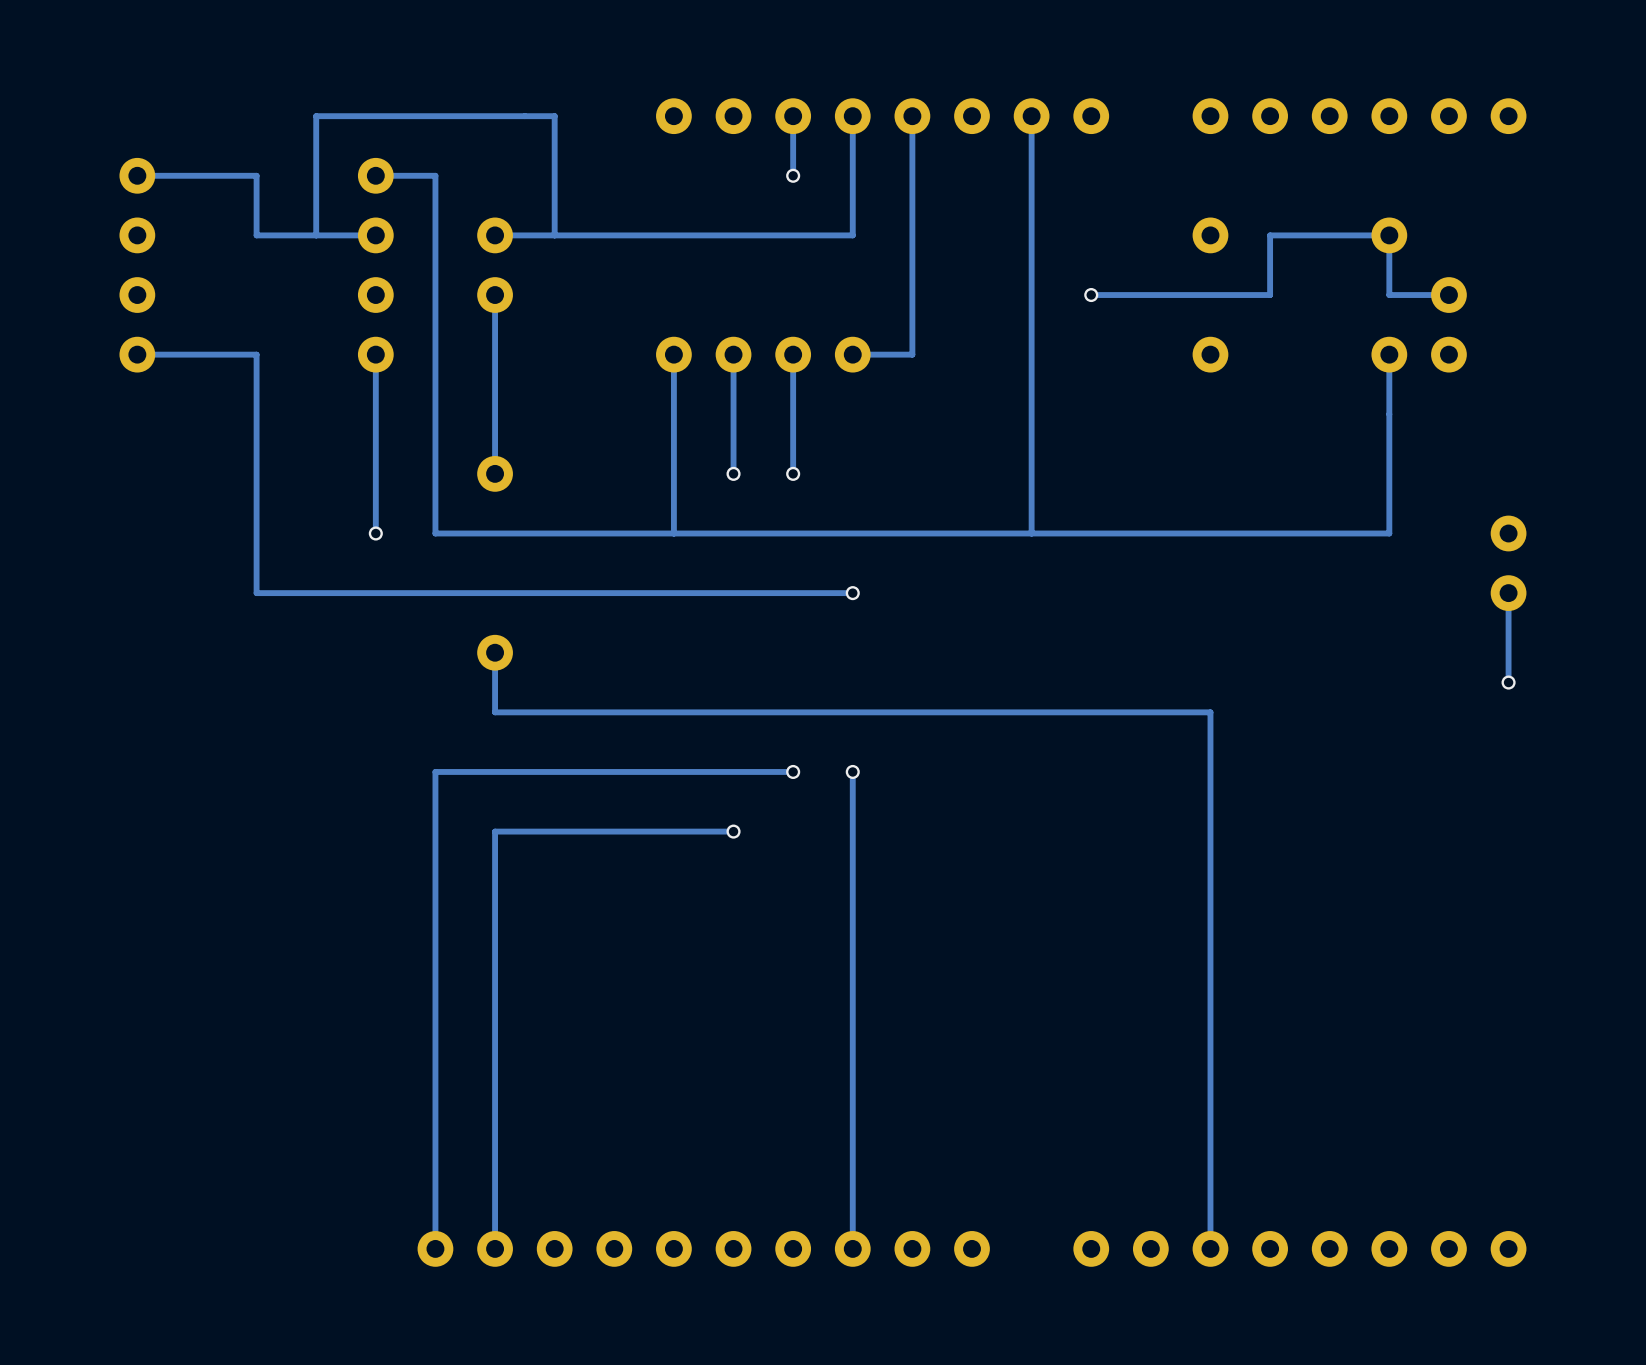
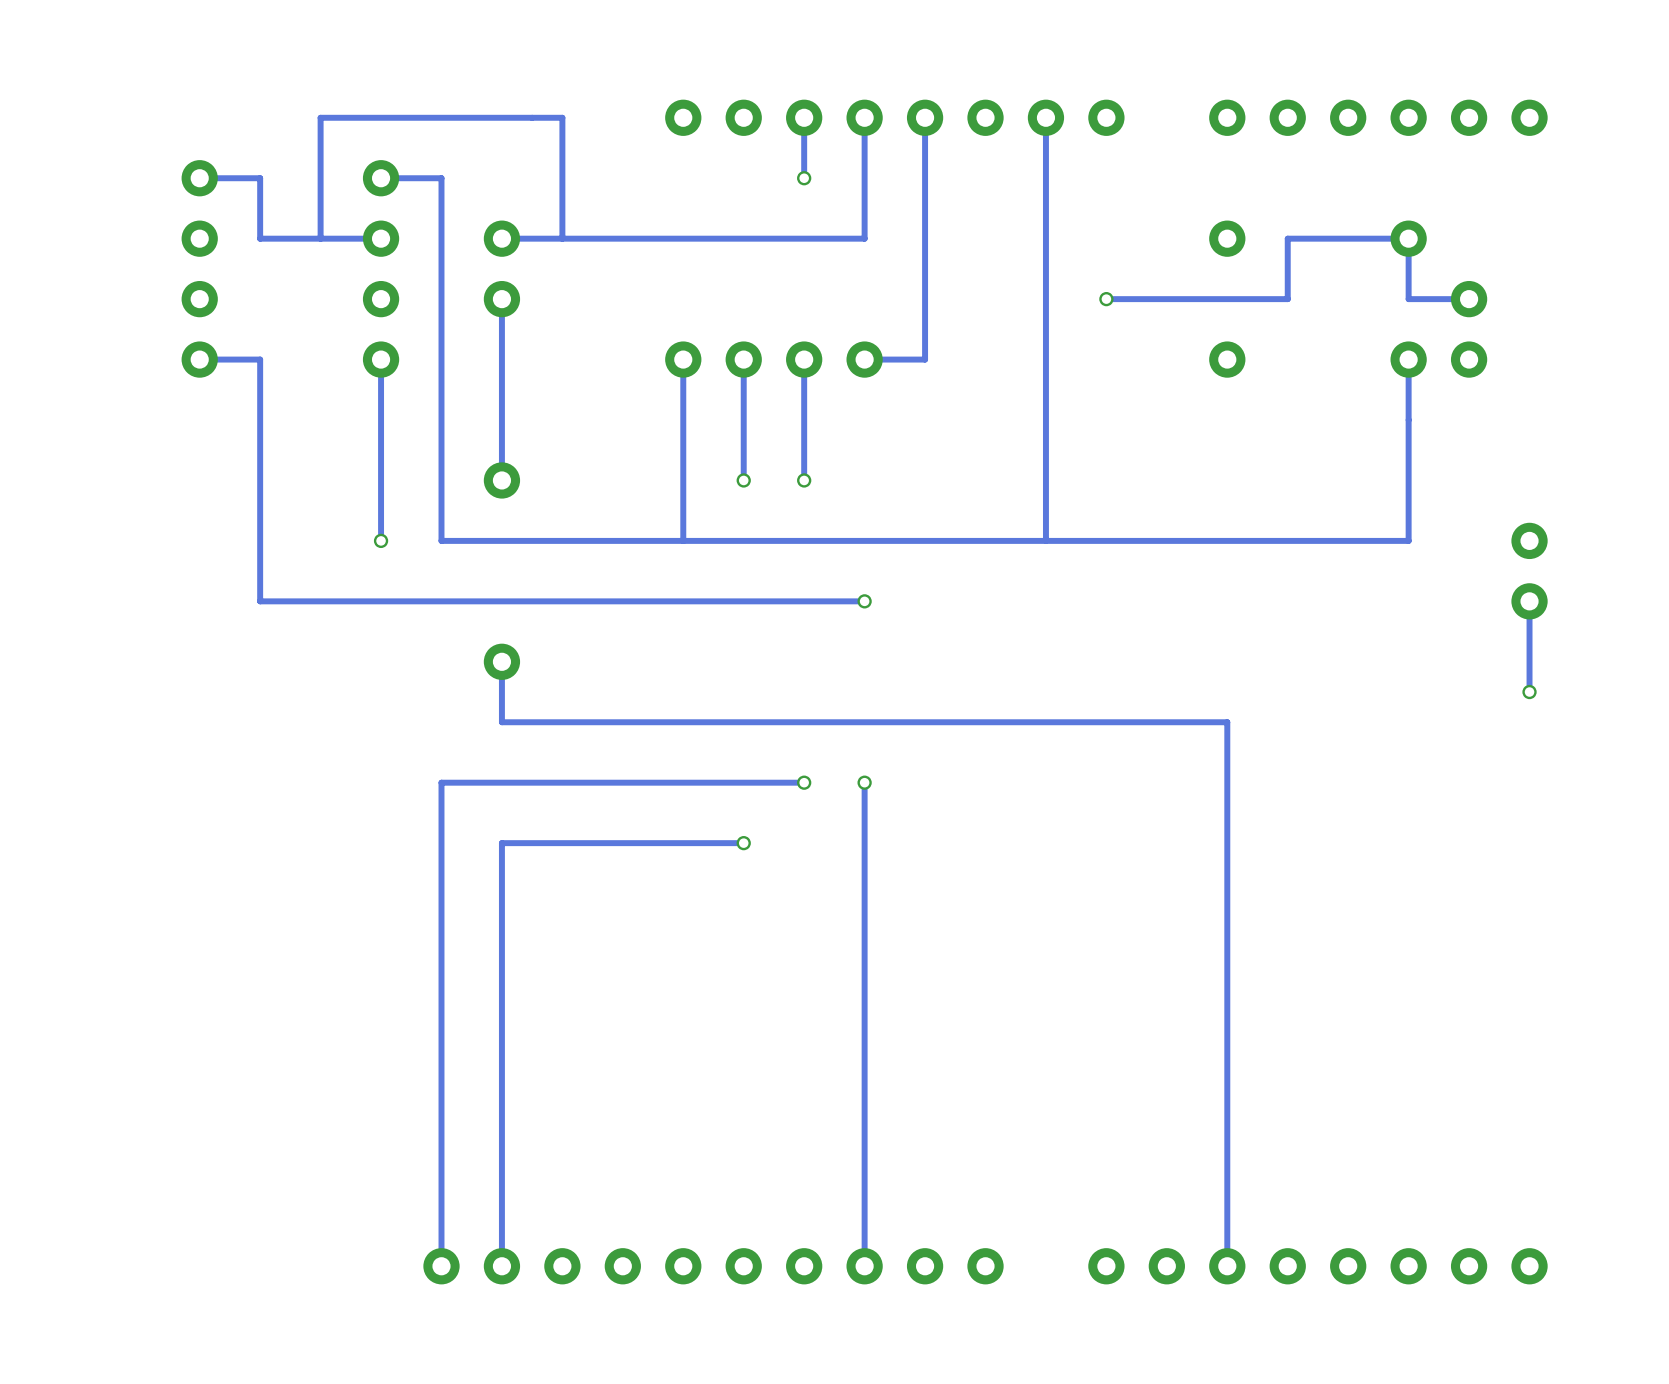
track: (196, 175) (137, 175) -> none
part position: (137, 265) -> (199, 268)
track: (196, 354) (137, 354) -> none

